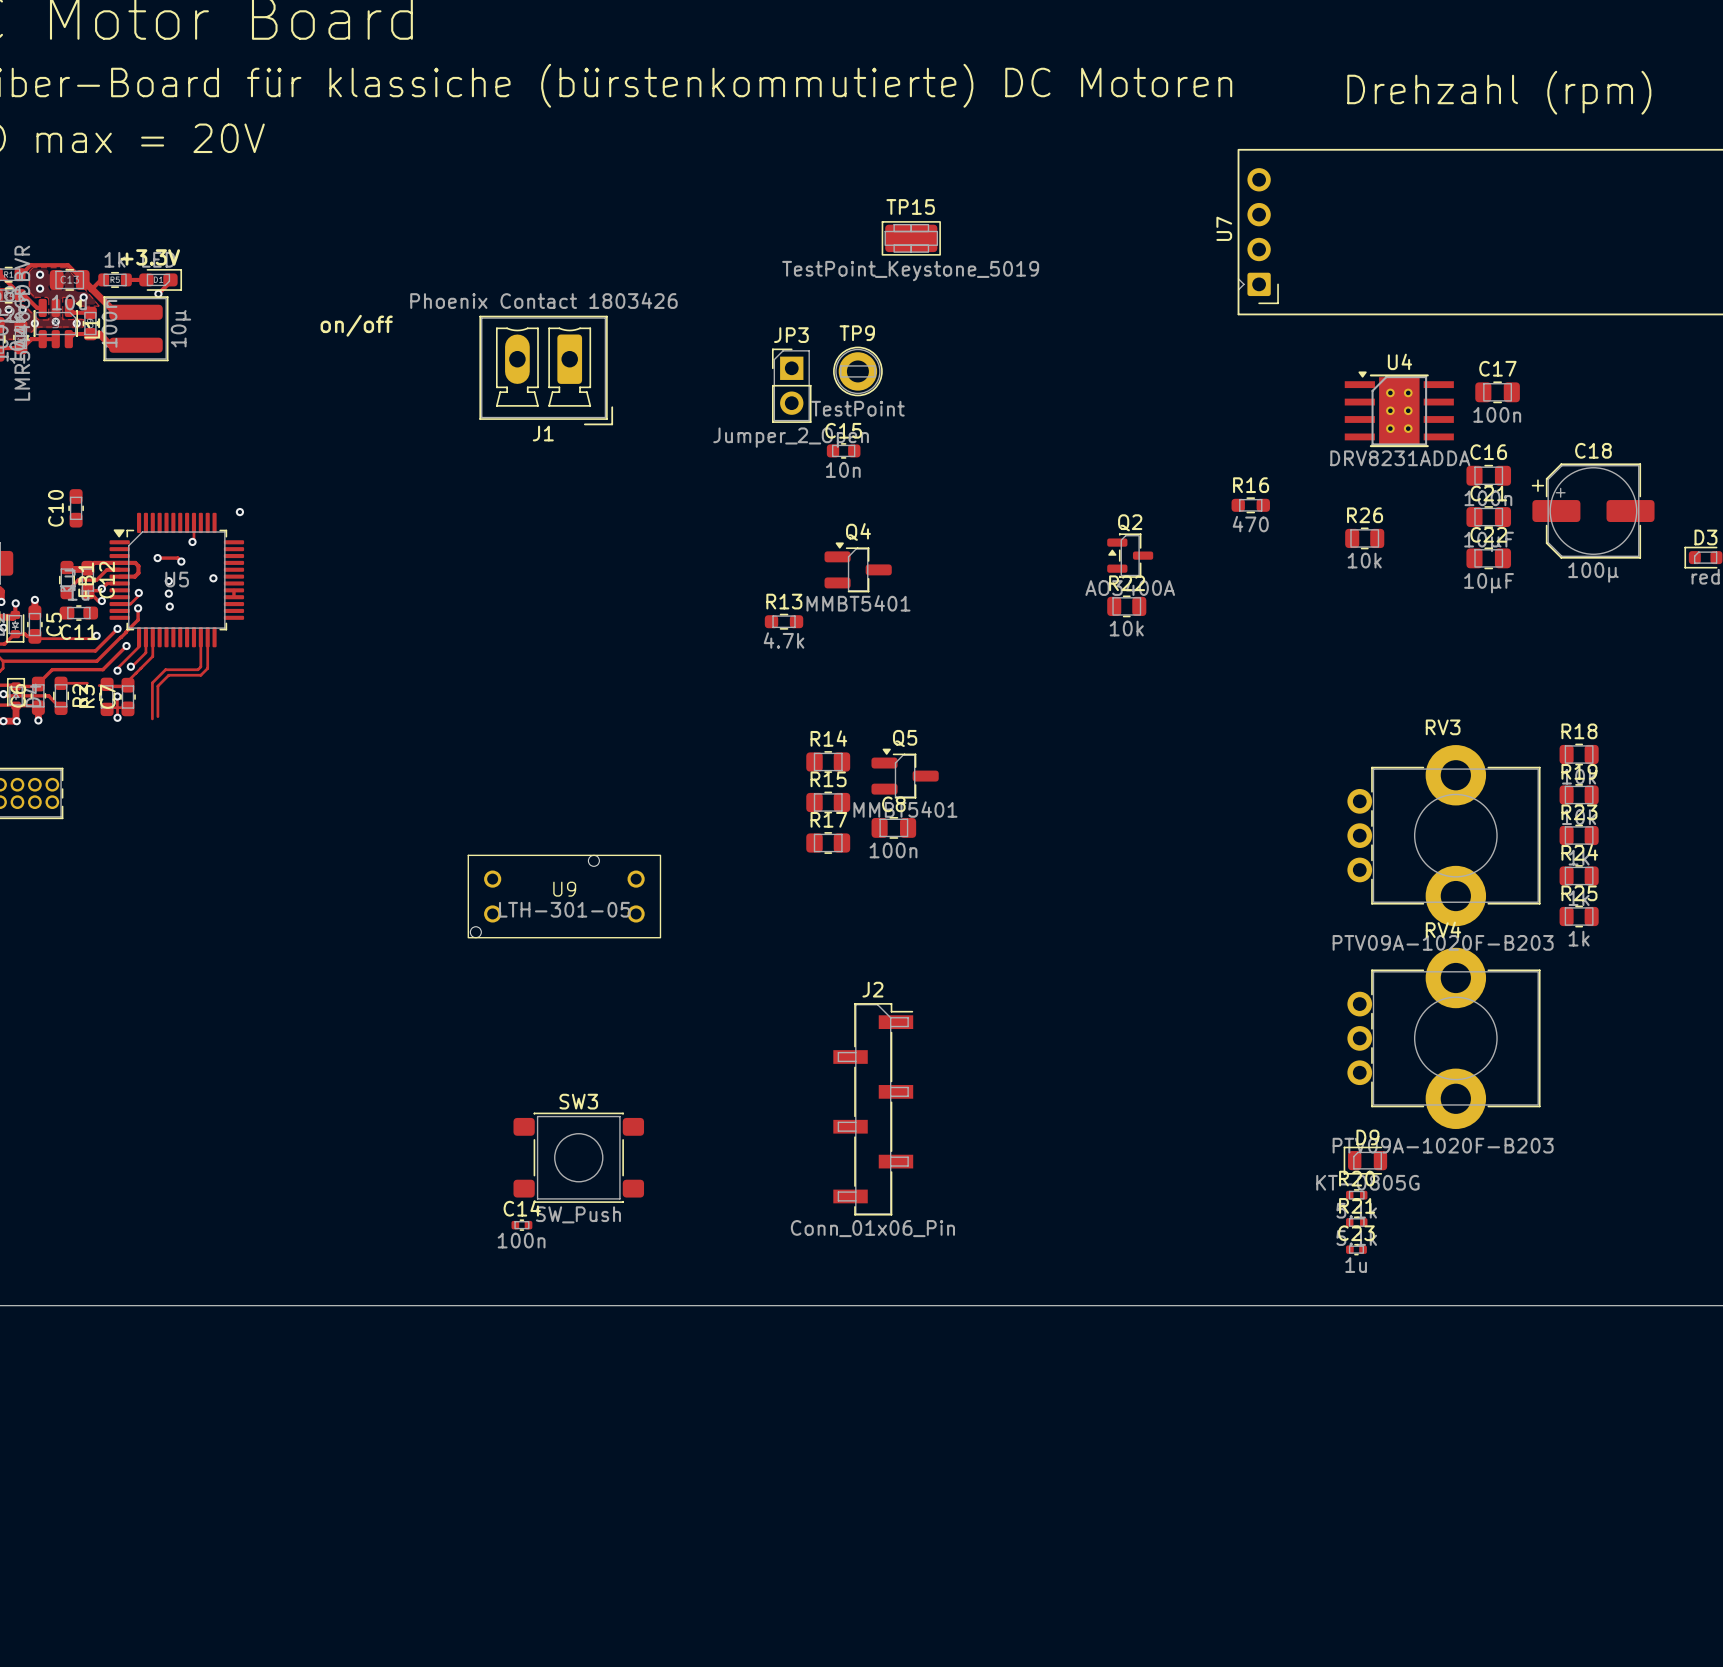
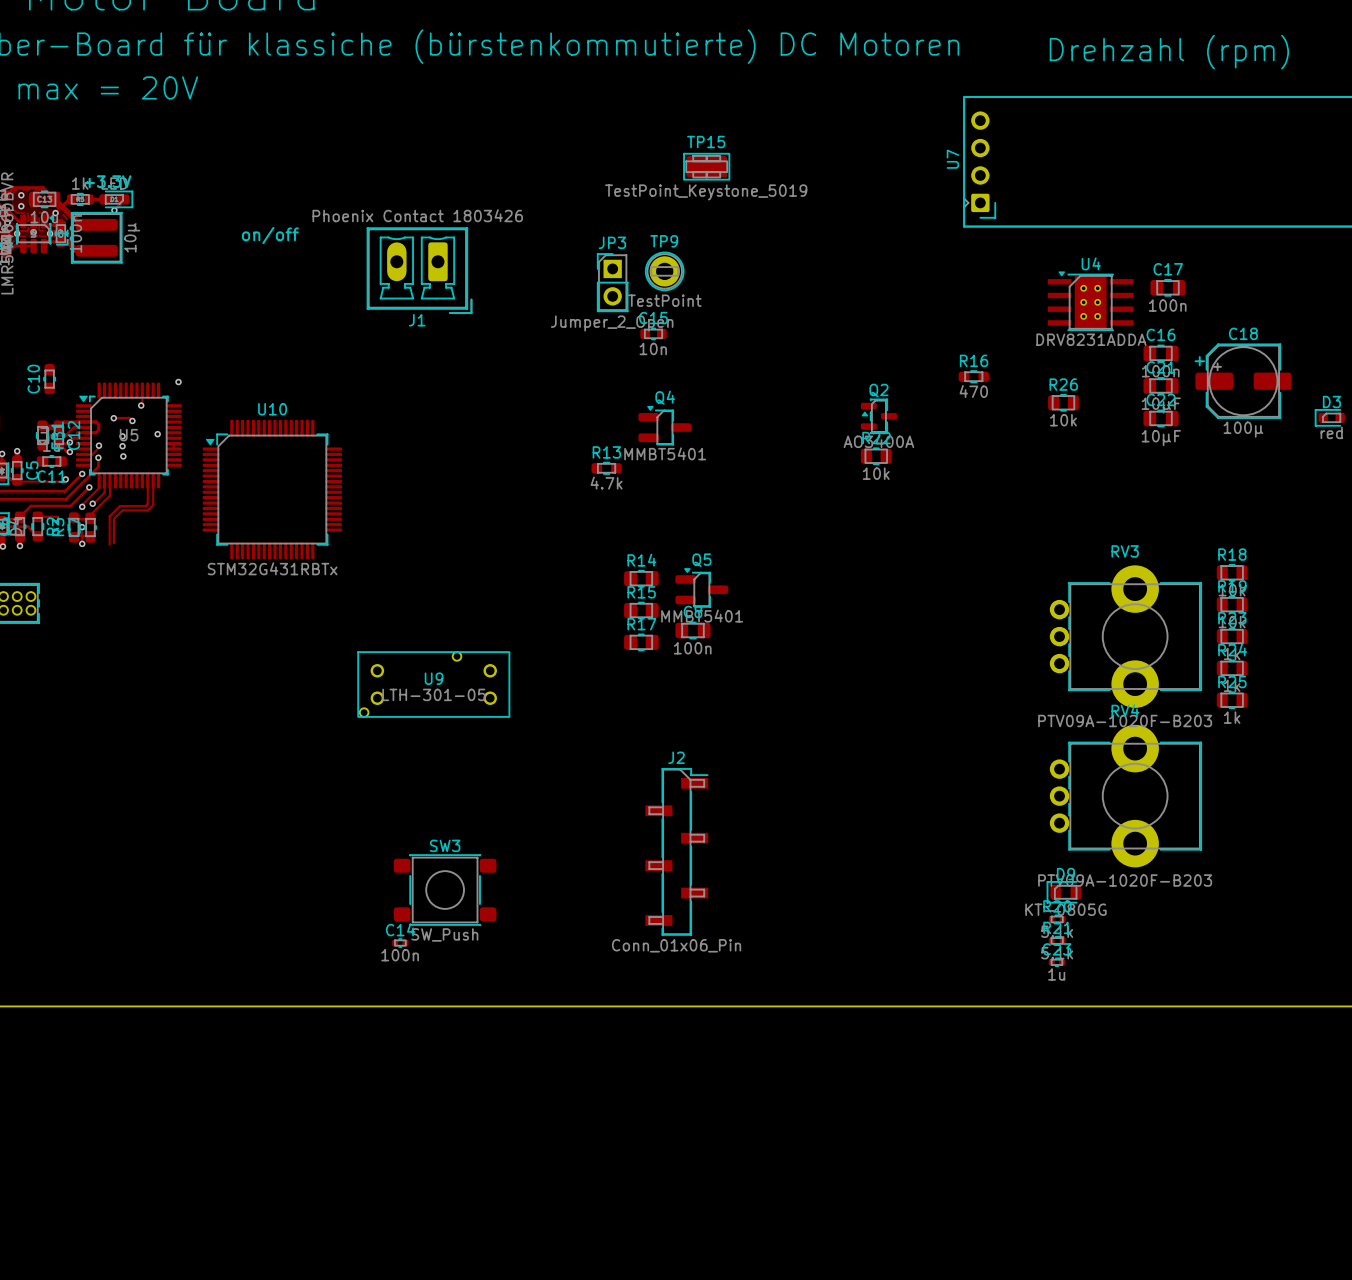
U10: none -> STM32G431RBTx (272, 489)

